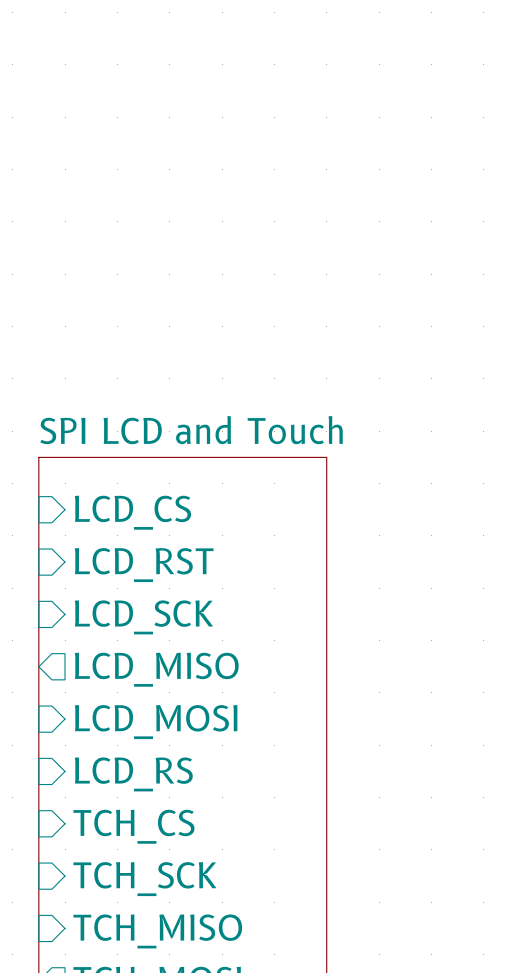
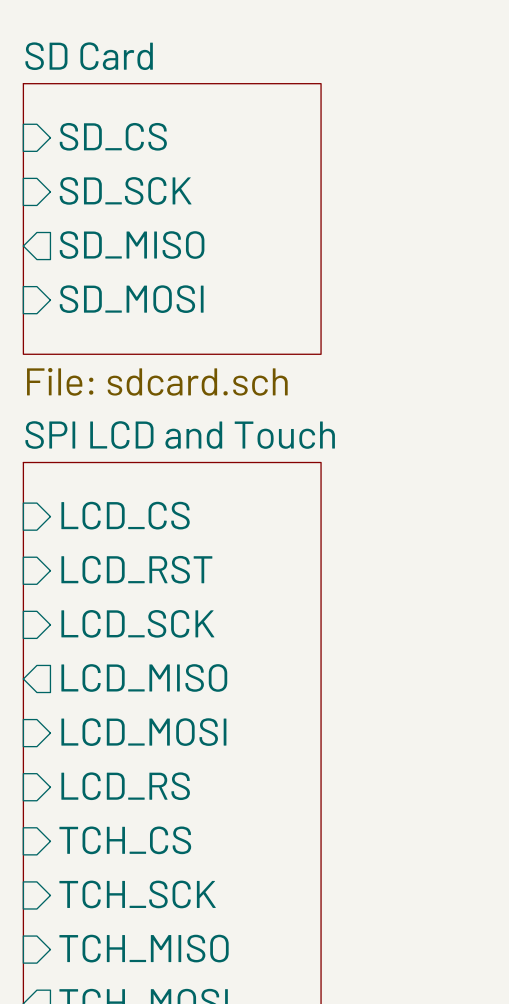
sheet pin: none -> SD_CS (113, 136)
sheet pin: none -> SD_SCK (125, 190)
sheet SD Card: none -> File: sdcard.sch (172, 218)
sheet pin: none -> SD_MISO (132, 245)
sheet pin: none -> SD_MOSI (131, 299)

